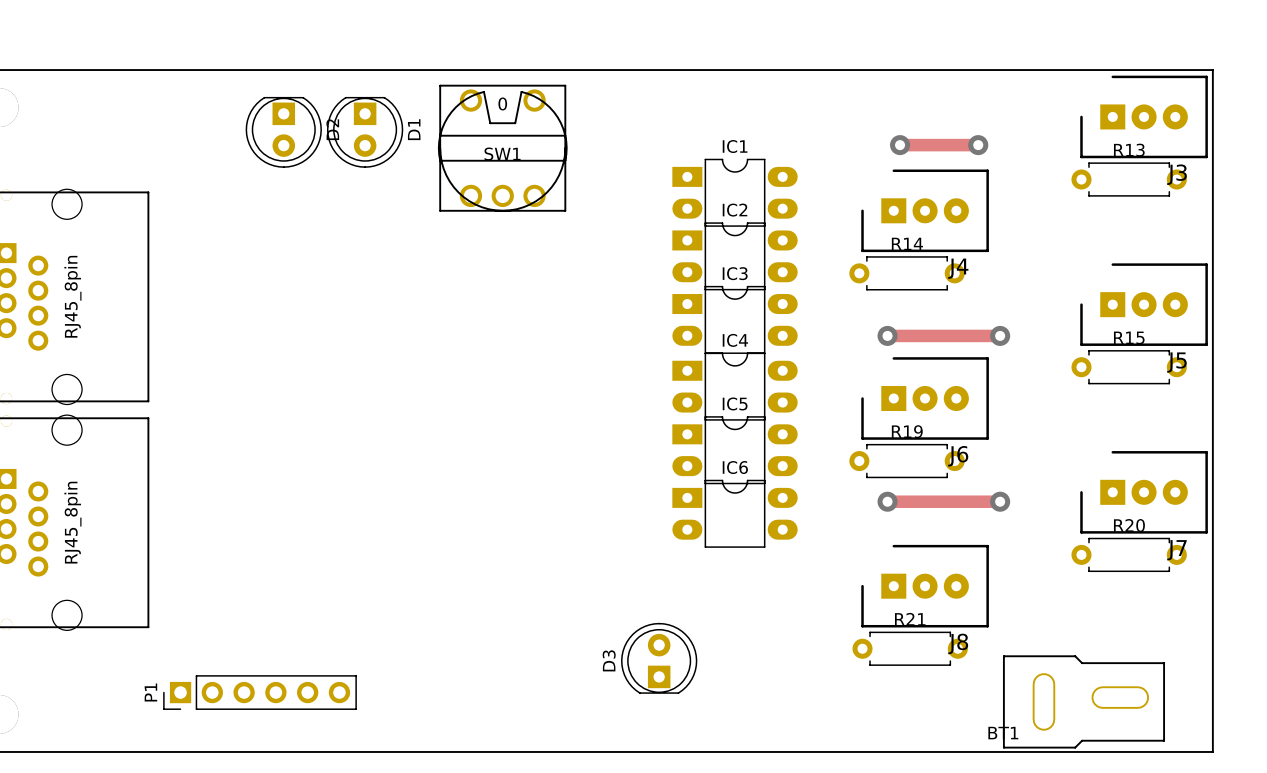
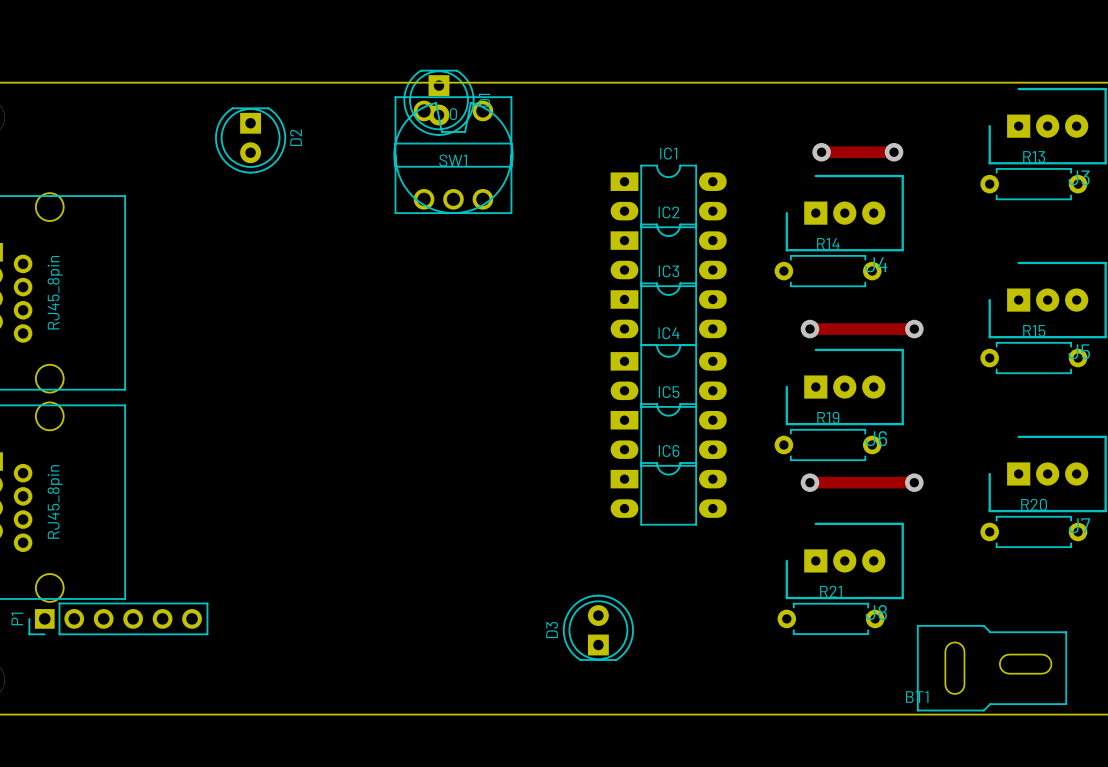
D1 position: (365, 132) -> (438, 102)
P1 position: (260, 692) -> (118, 618)

